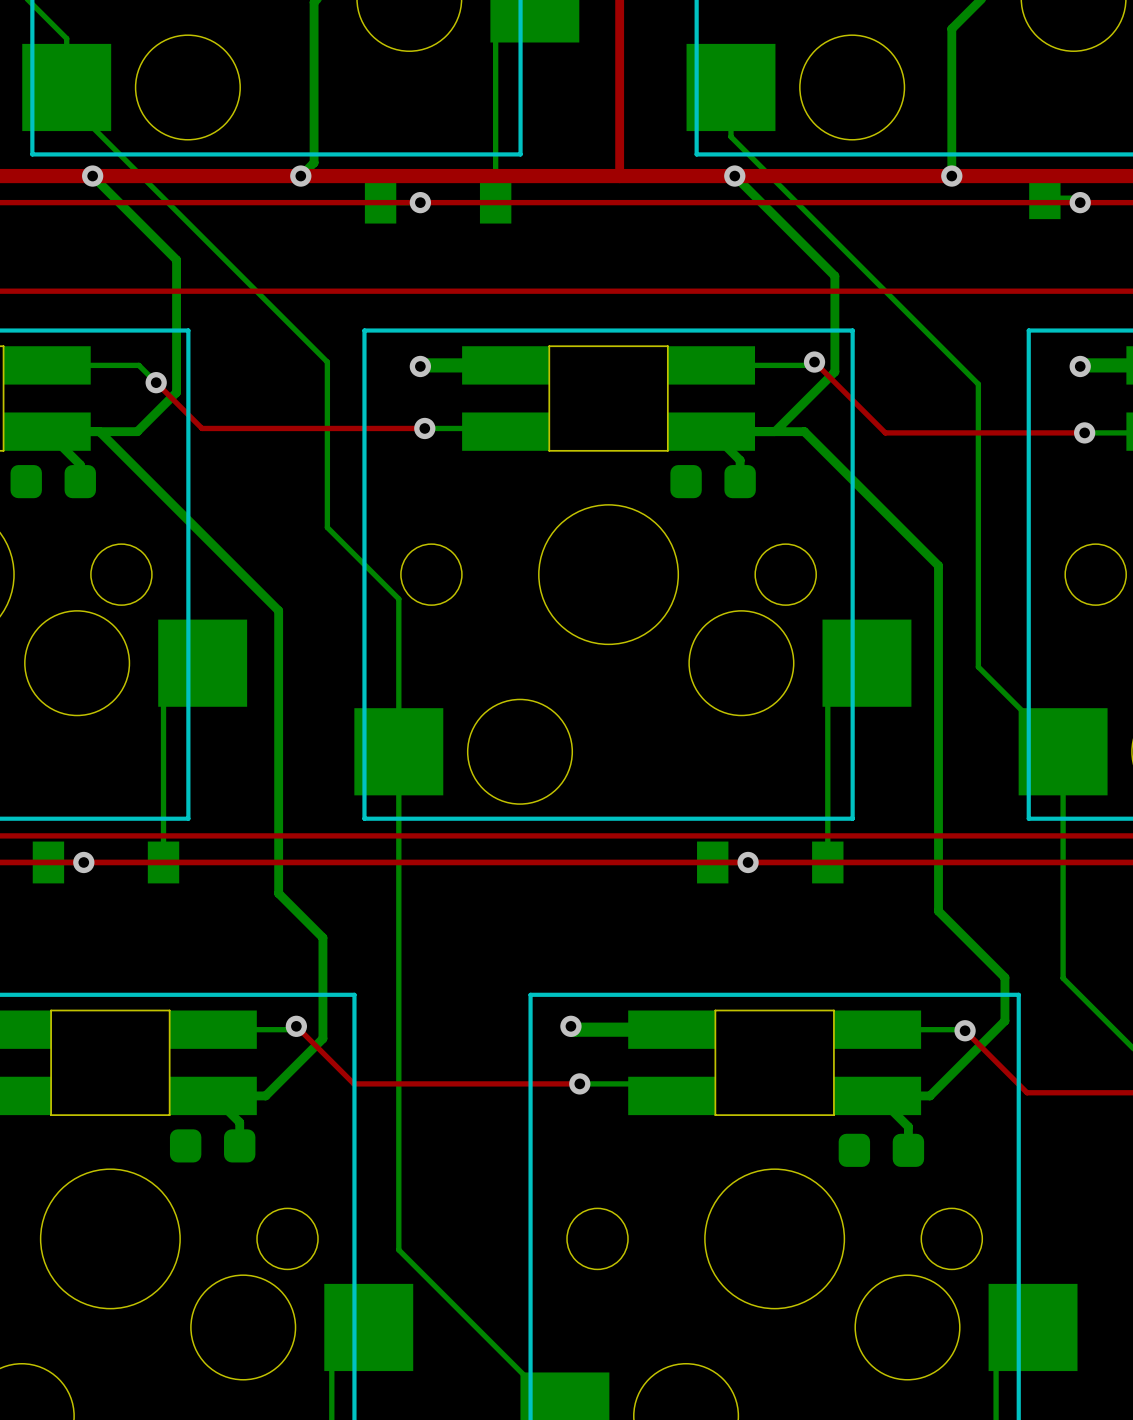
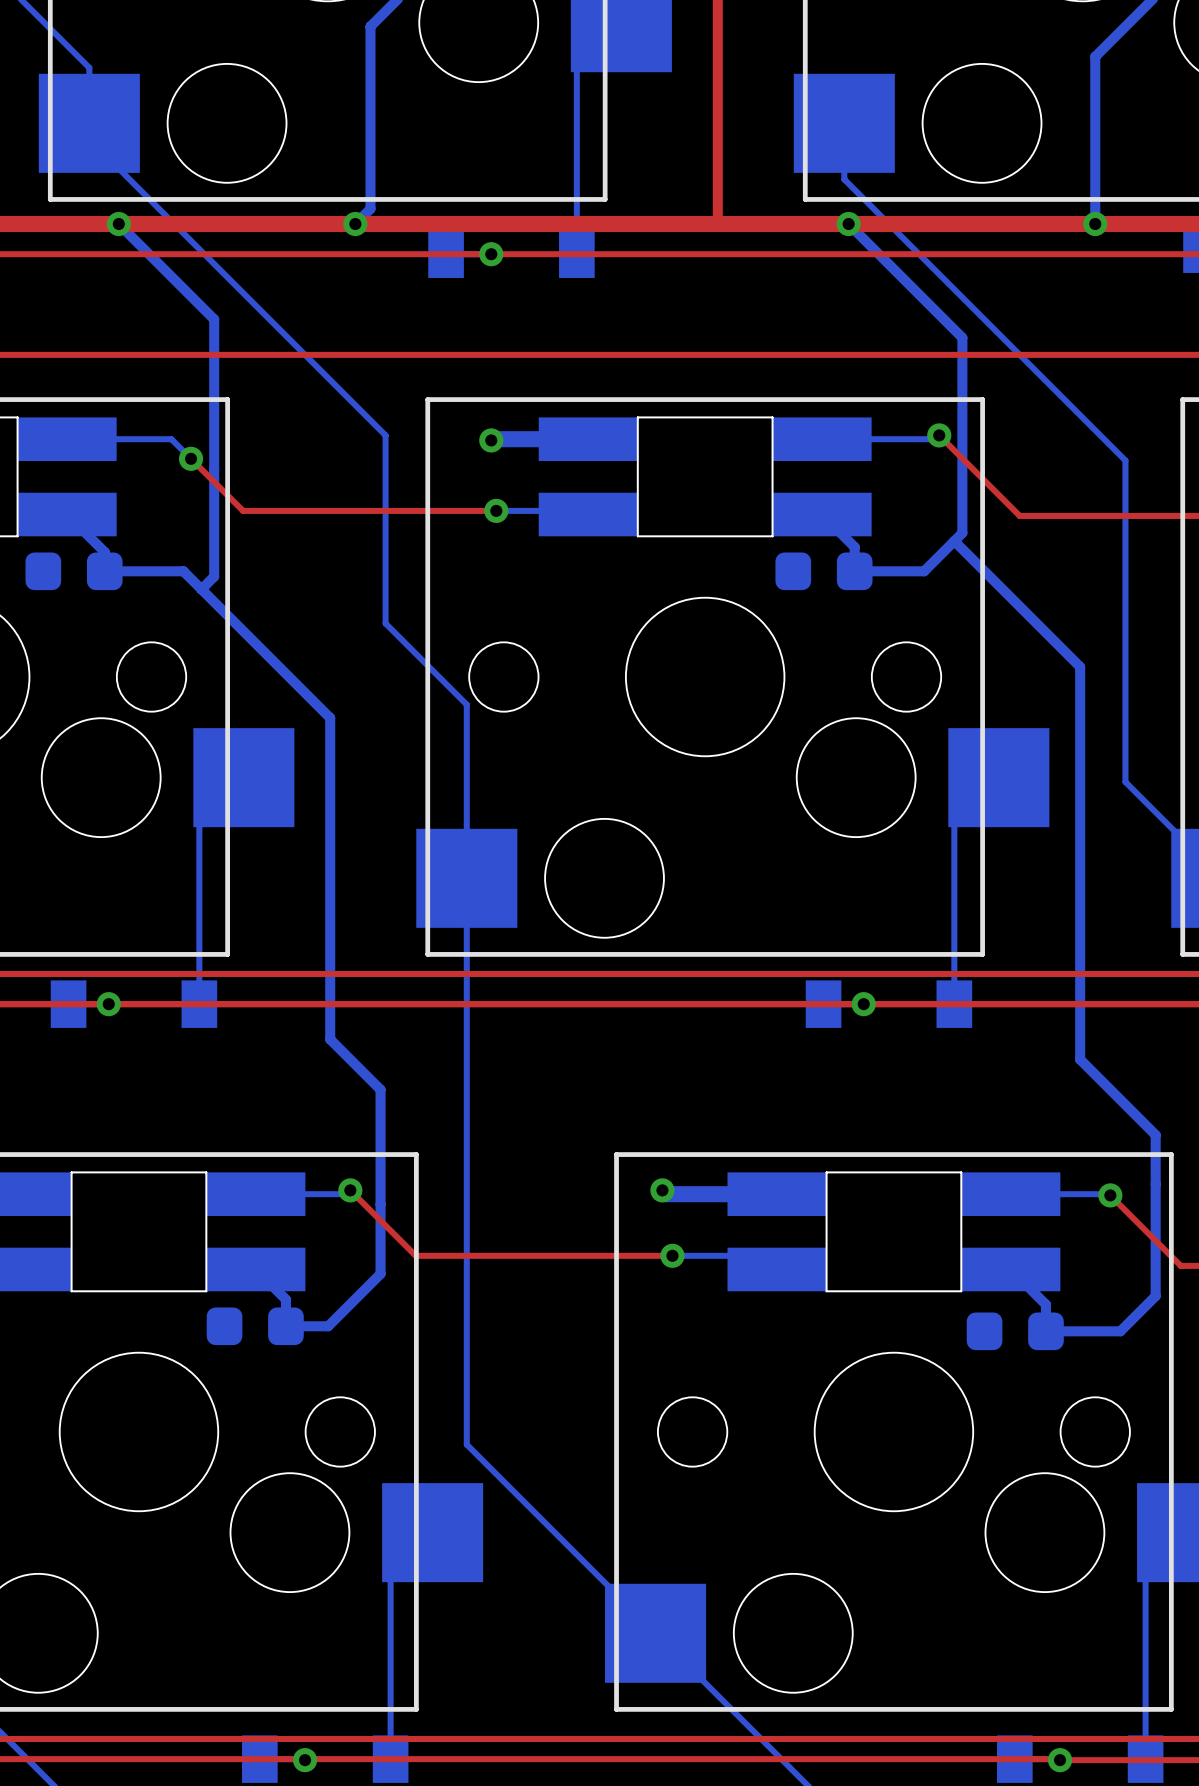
bottom track: (834, 371) (775, 431) -> (962, 446) (962, 533) (924, 571) (854, 571)
bottom track: (176, 392) (137, 431) (47, 431) -> (214, 469) (214, 576) (201, 589)
bottom track: (99, 431) (149, 481) -> (104, 571) (183, 571)
bottom track: (711, 431) (804, 431) (827, 455) -> none
bottom track: (1004, 1020) (929, 1095) (877, 1095) -> (1155, 1184) (1155, 1296) (1120, 1331) (1045, 1331)
bottom track: (322, 1038) (265, 1095) (213, 1095) -> (380, 1204) (380, 1273) (328, 1326) (289, 1326)

